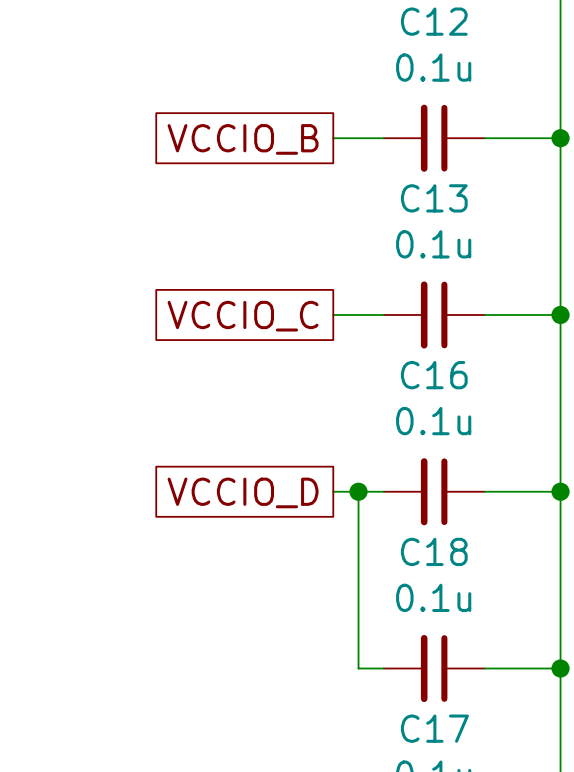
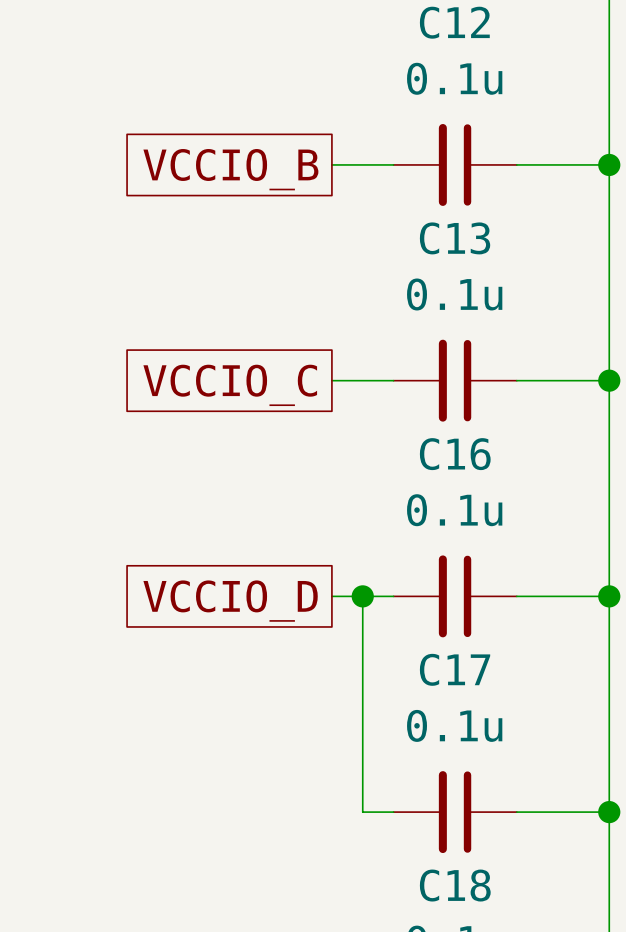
C18 name: C18 (434, 551) -> C17 (455, 669)
C17 name: C17 (434, 728) -> C18 (455, 885)

